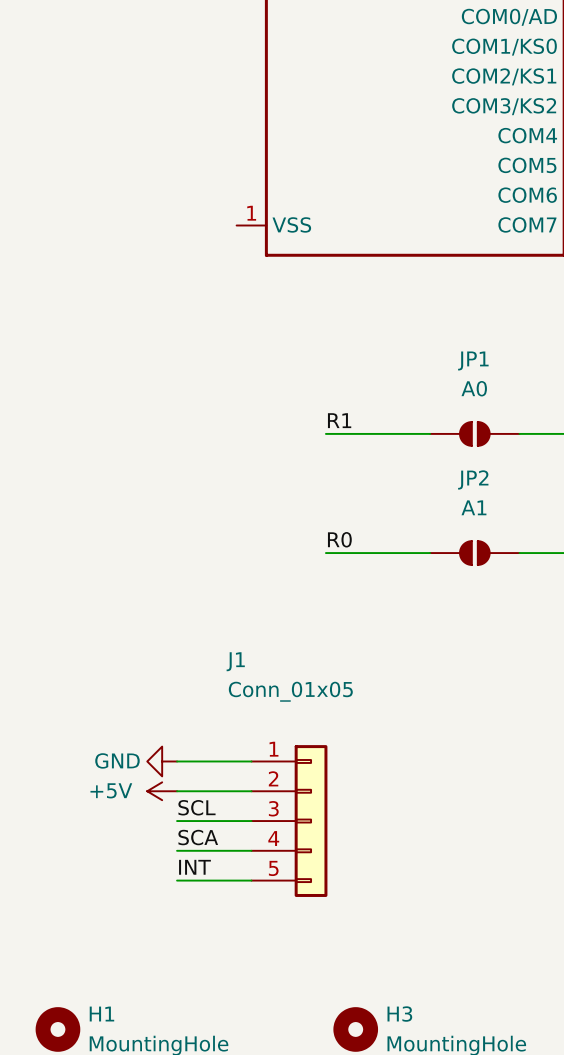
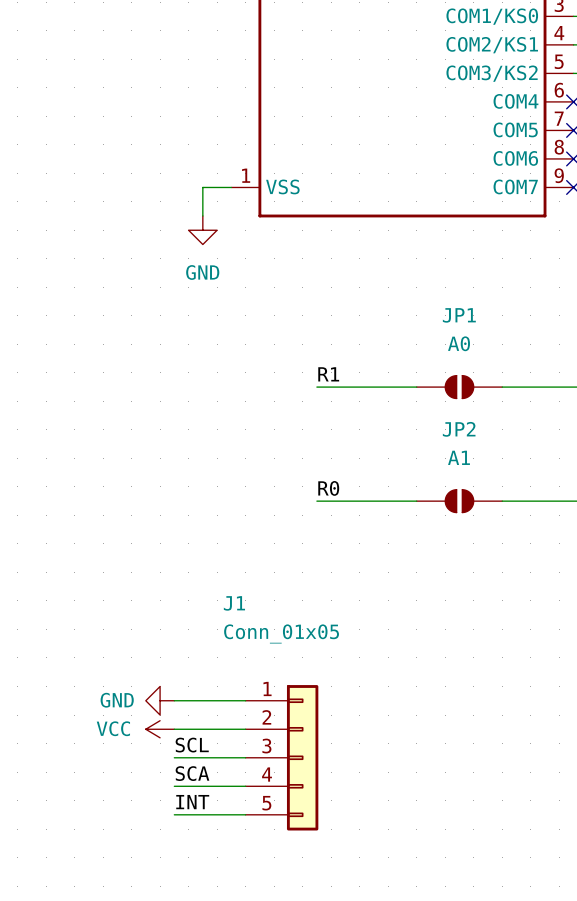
wire: none -> (231, 187) (202, 187) (202, 215)
power symbol: none -> GND (202, 230)
power symbol: +5V (162, 791) -> VCC (160, 729)

